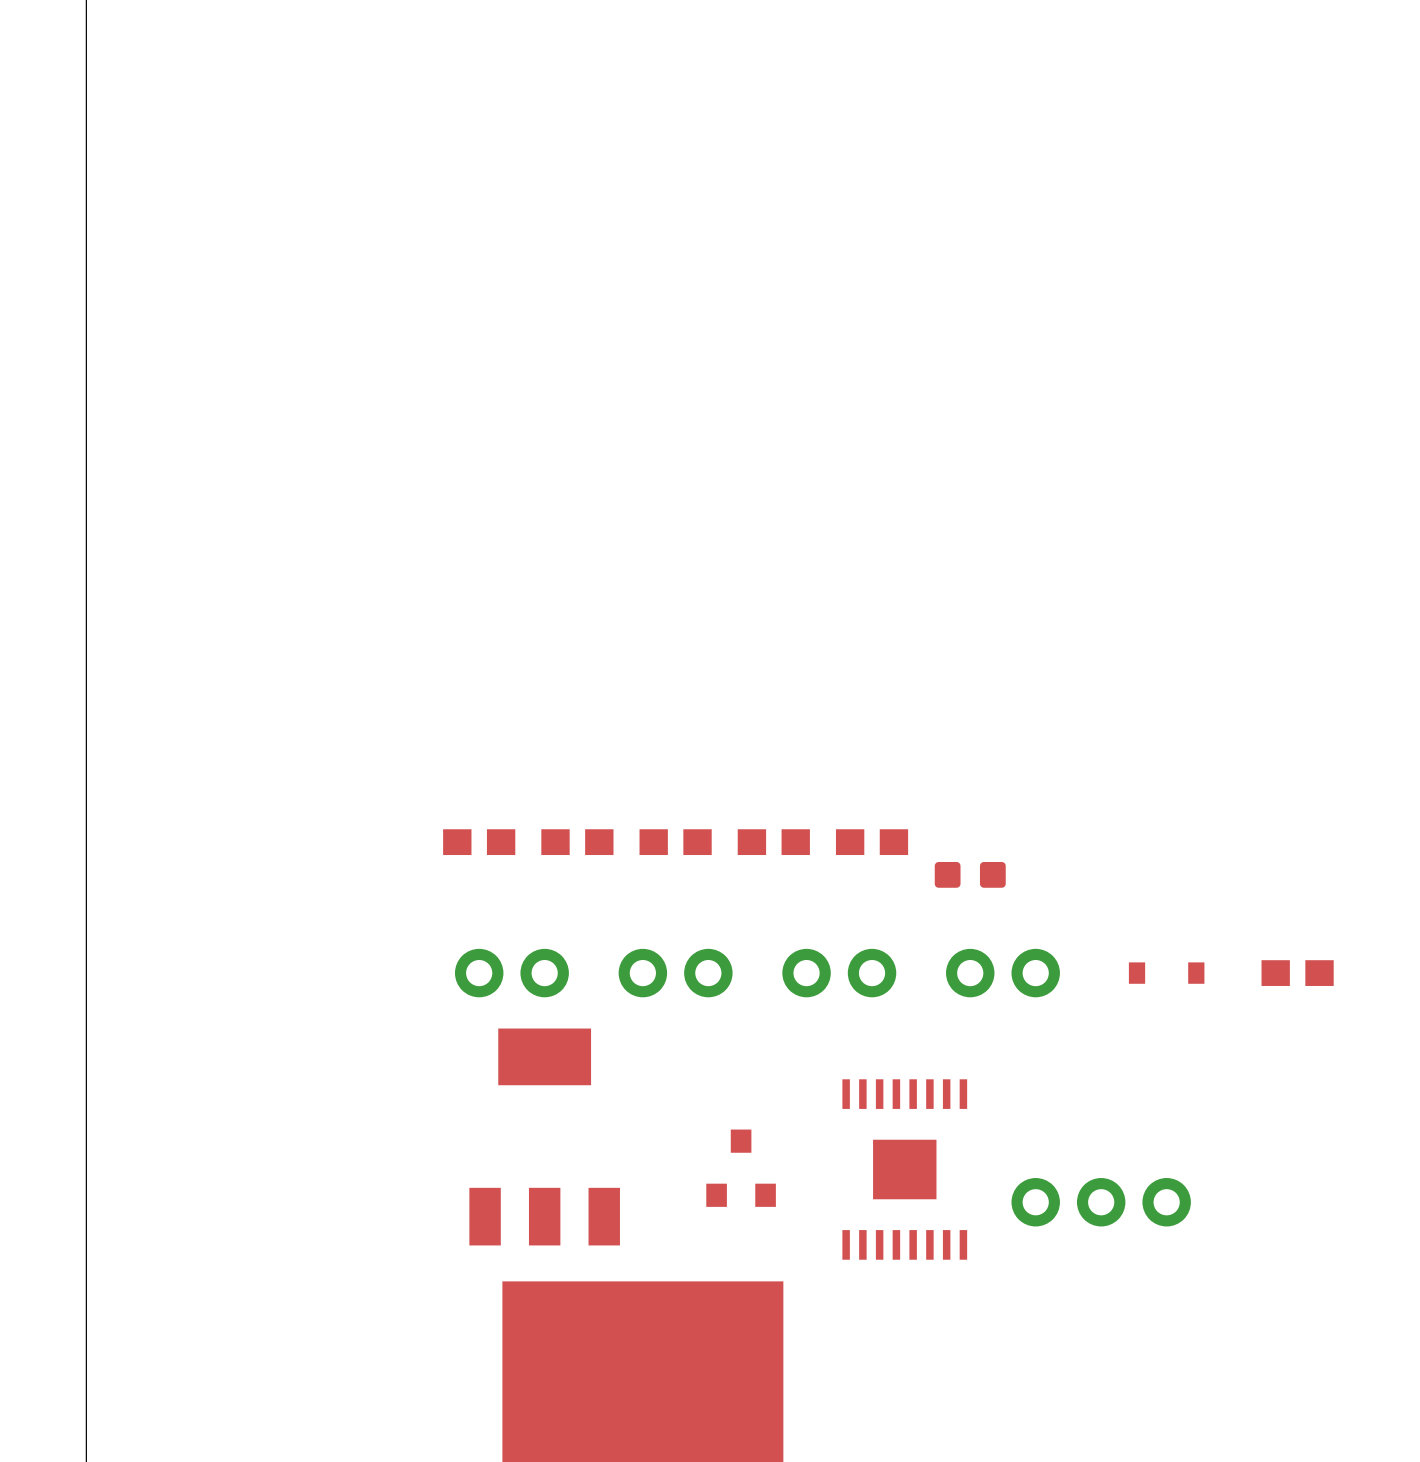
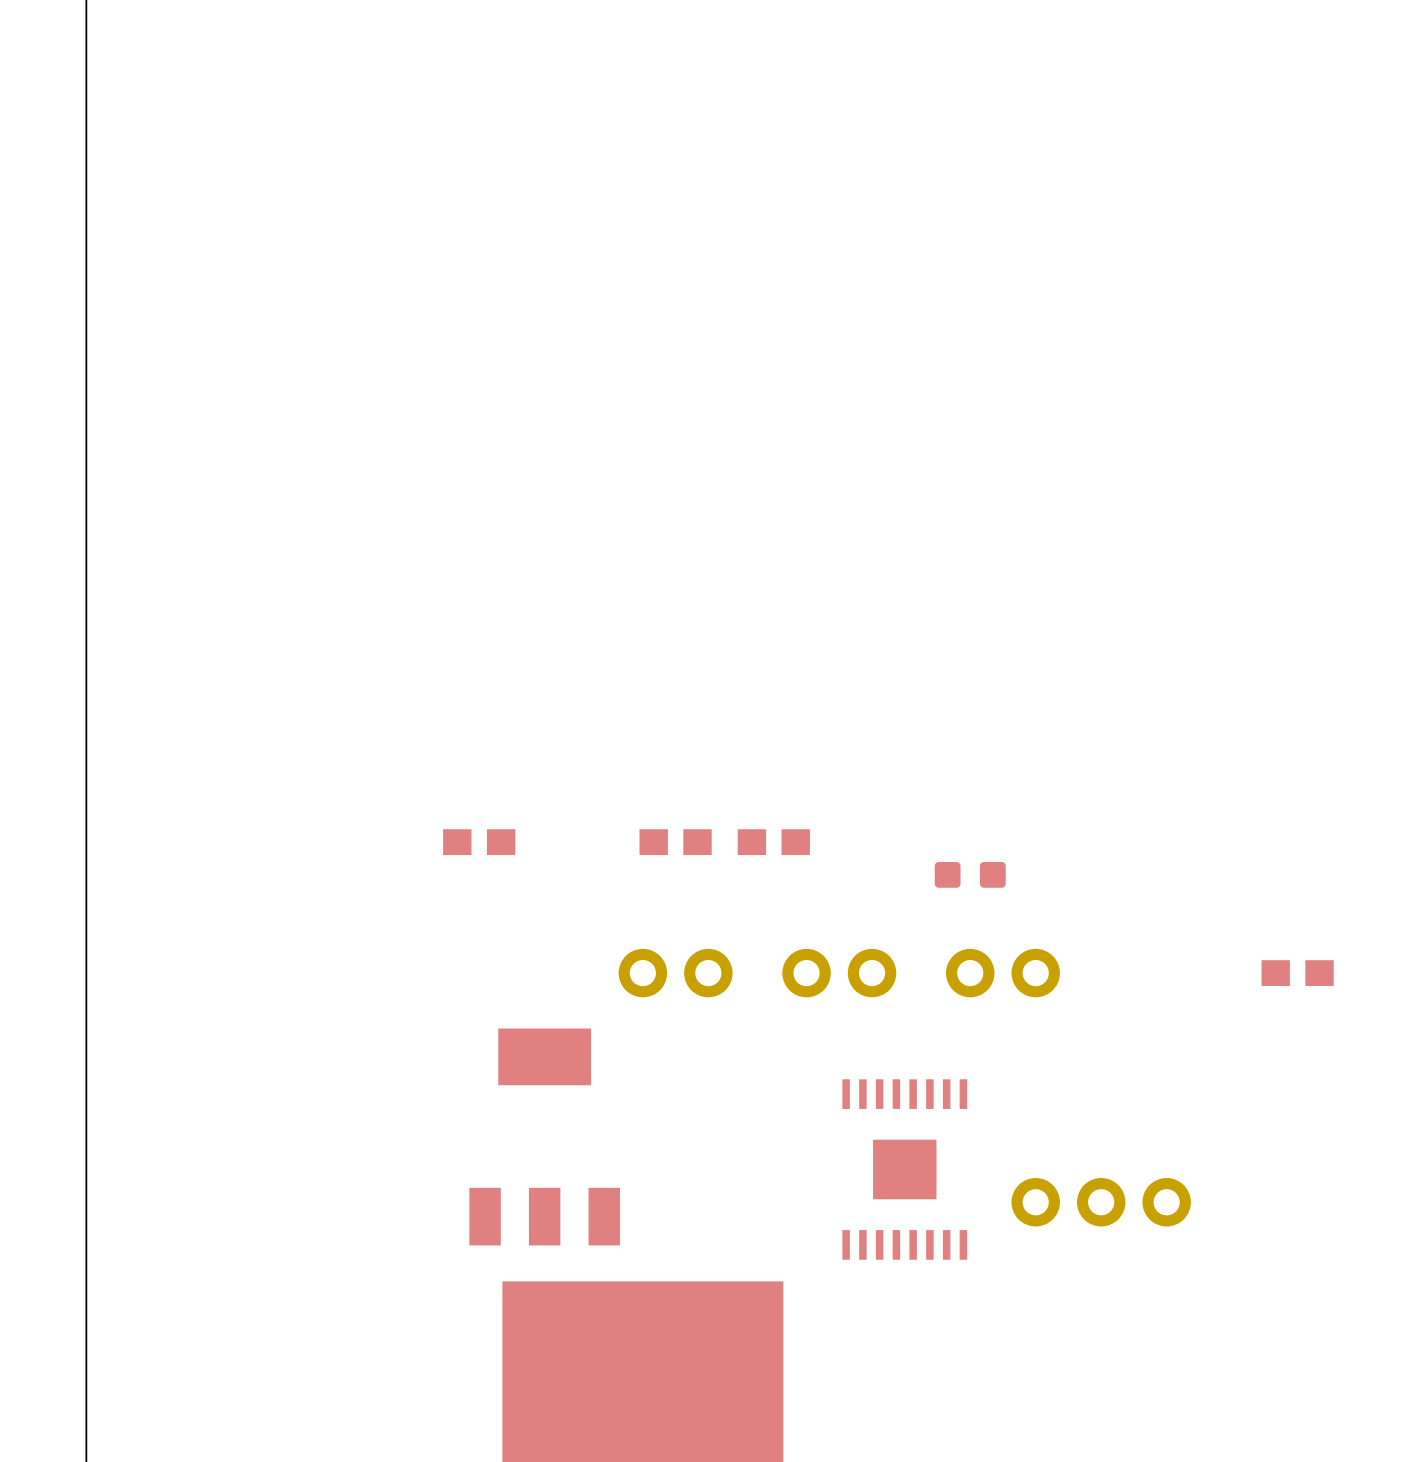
part: (577, 842) -> none
part: (872, 842) -> none
part: (511, 973) -> none
part: (1166, 973) -> none
part: (741, 1168) -> none

